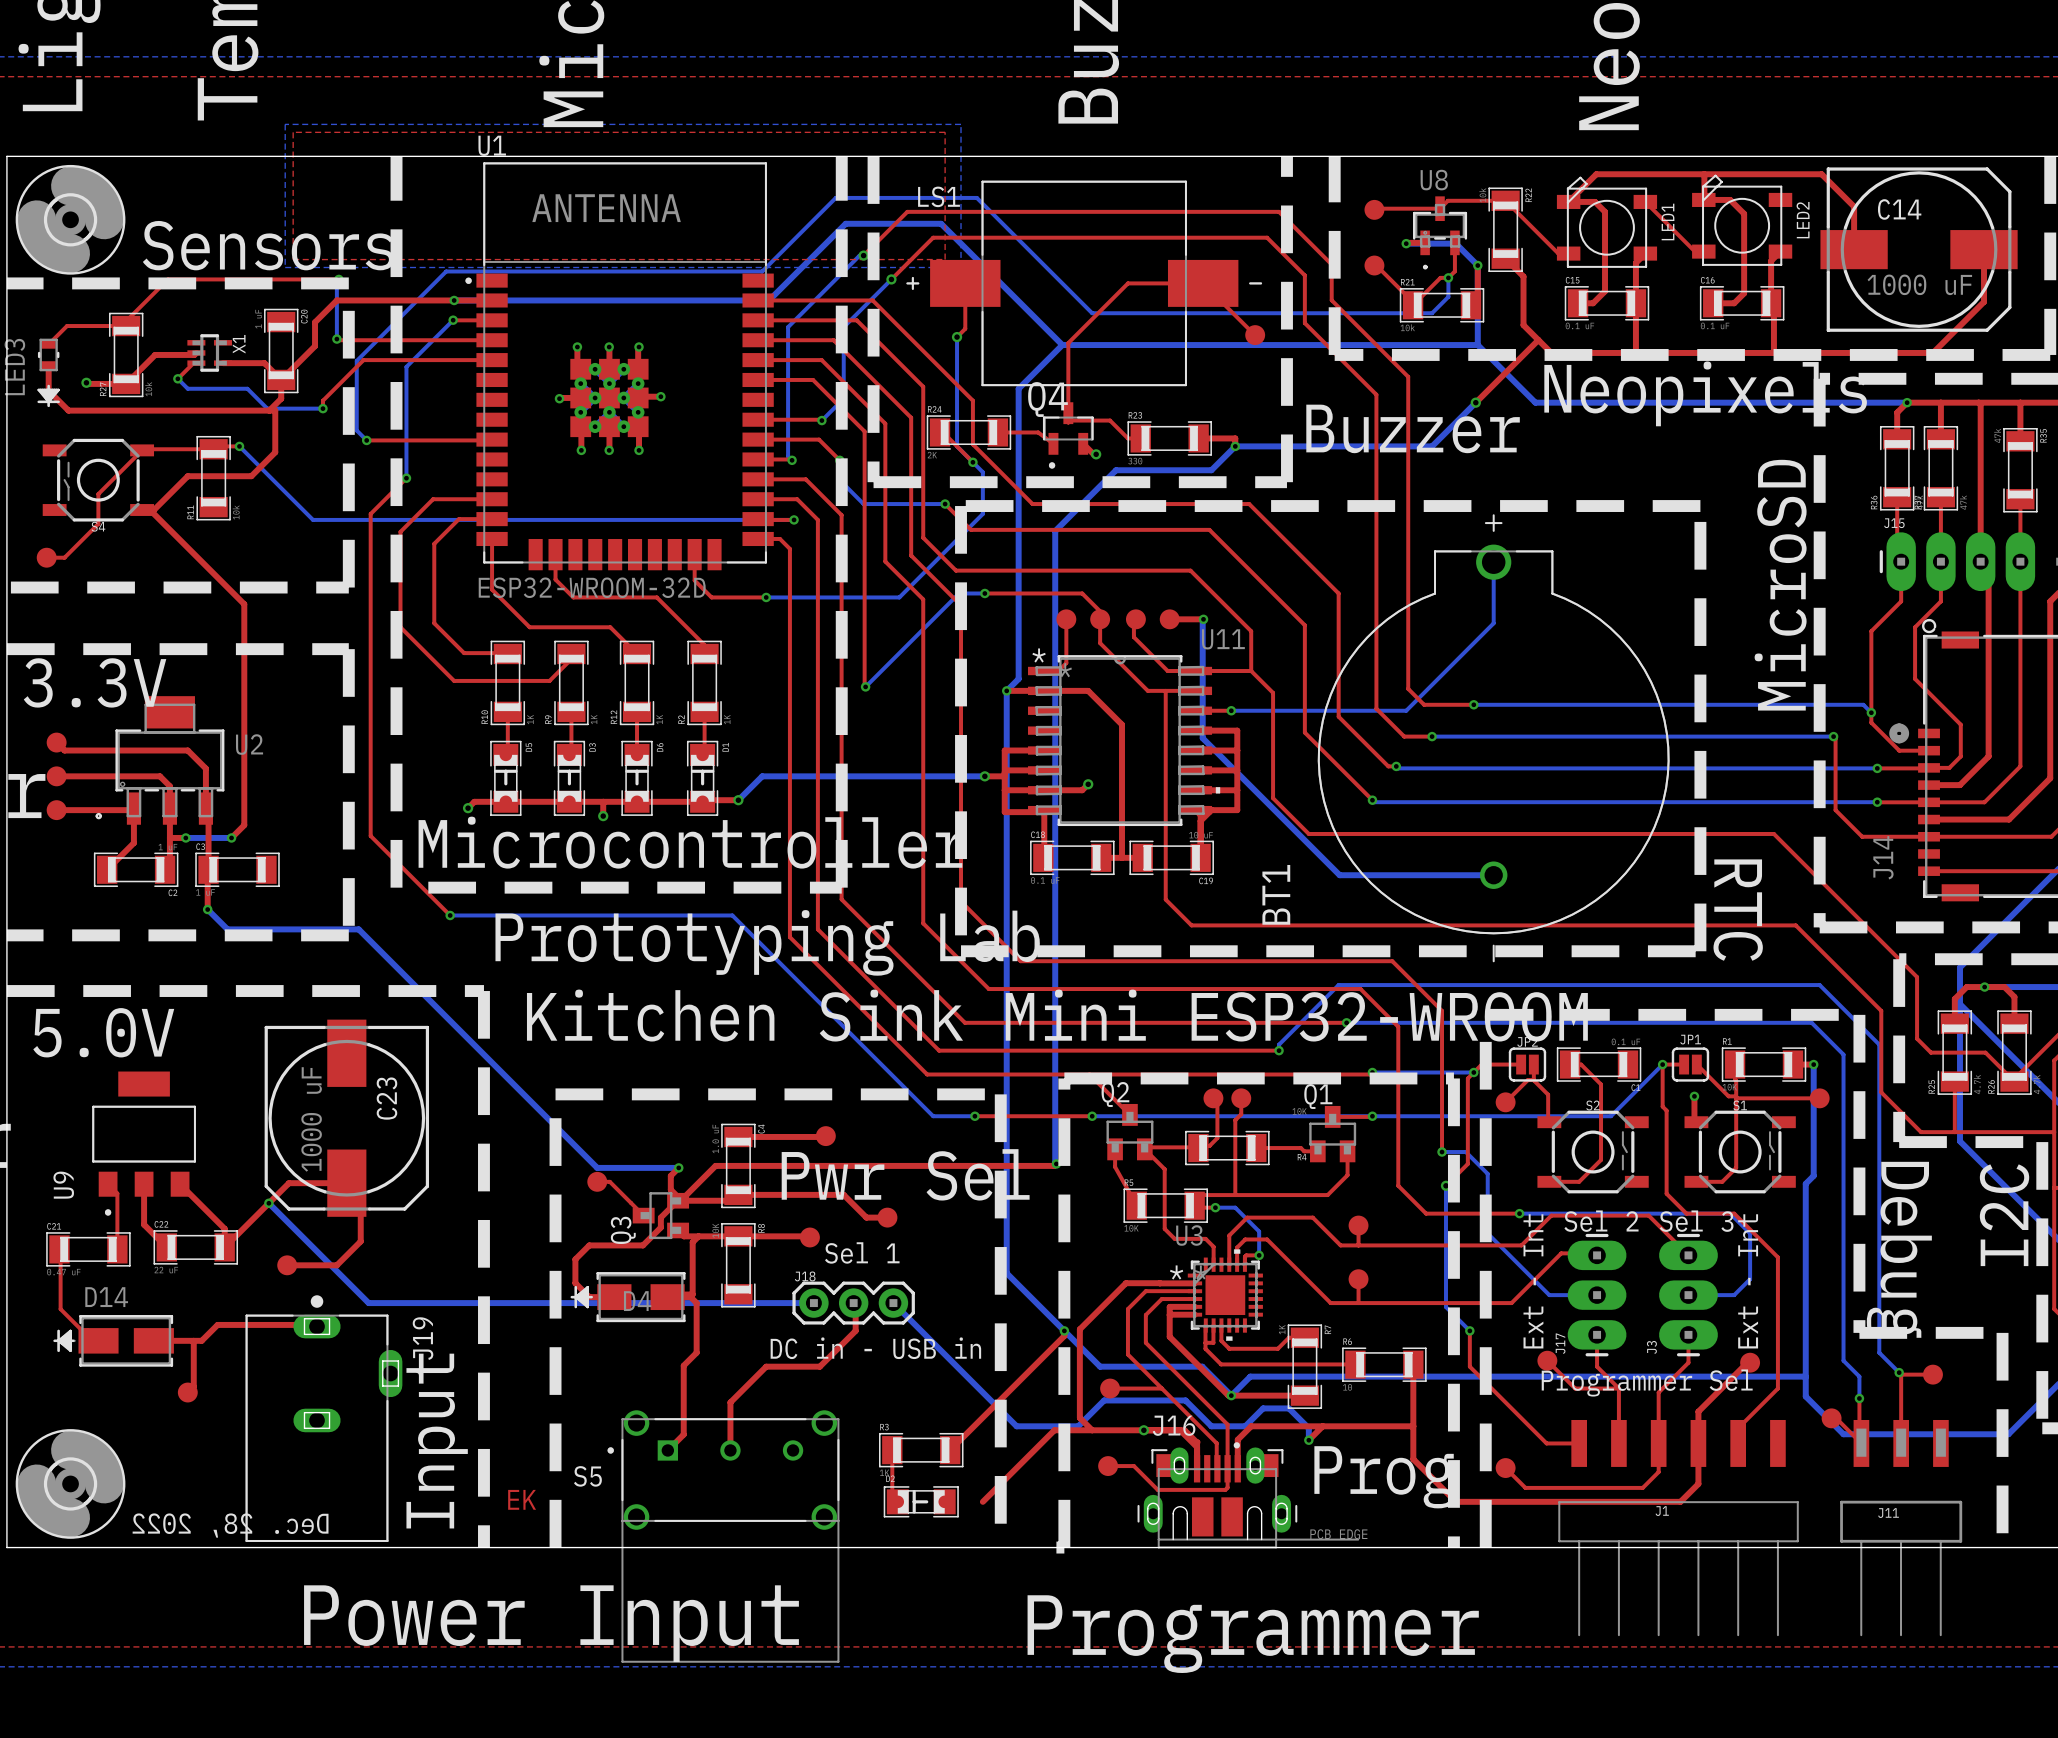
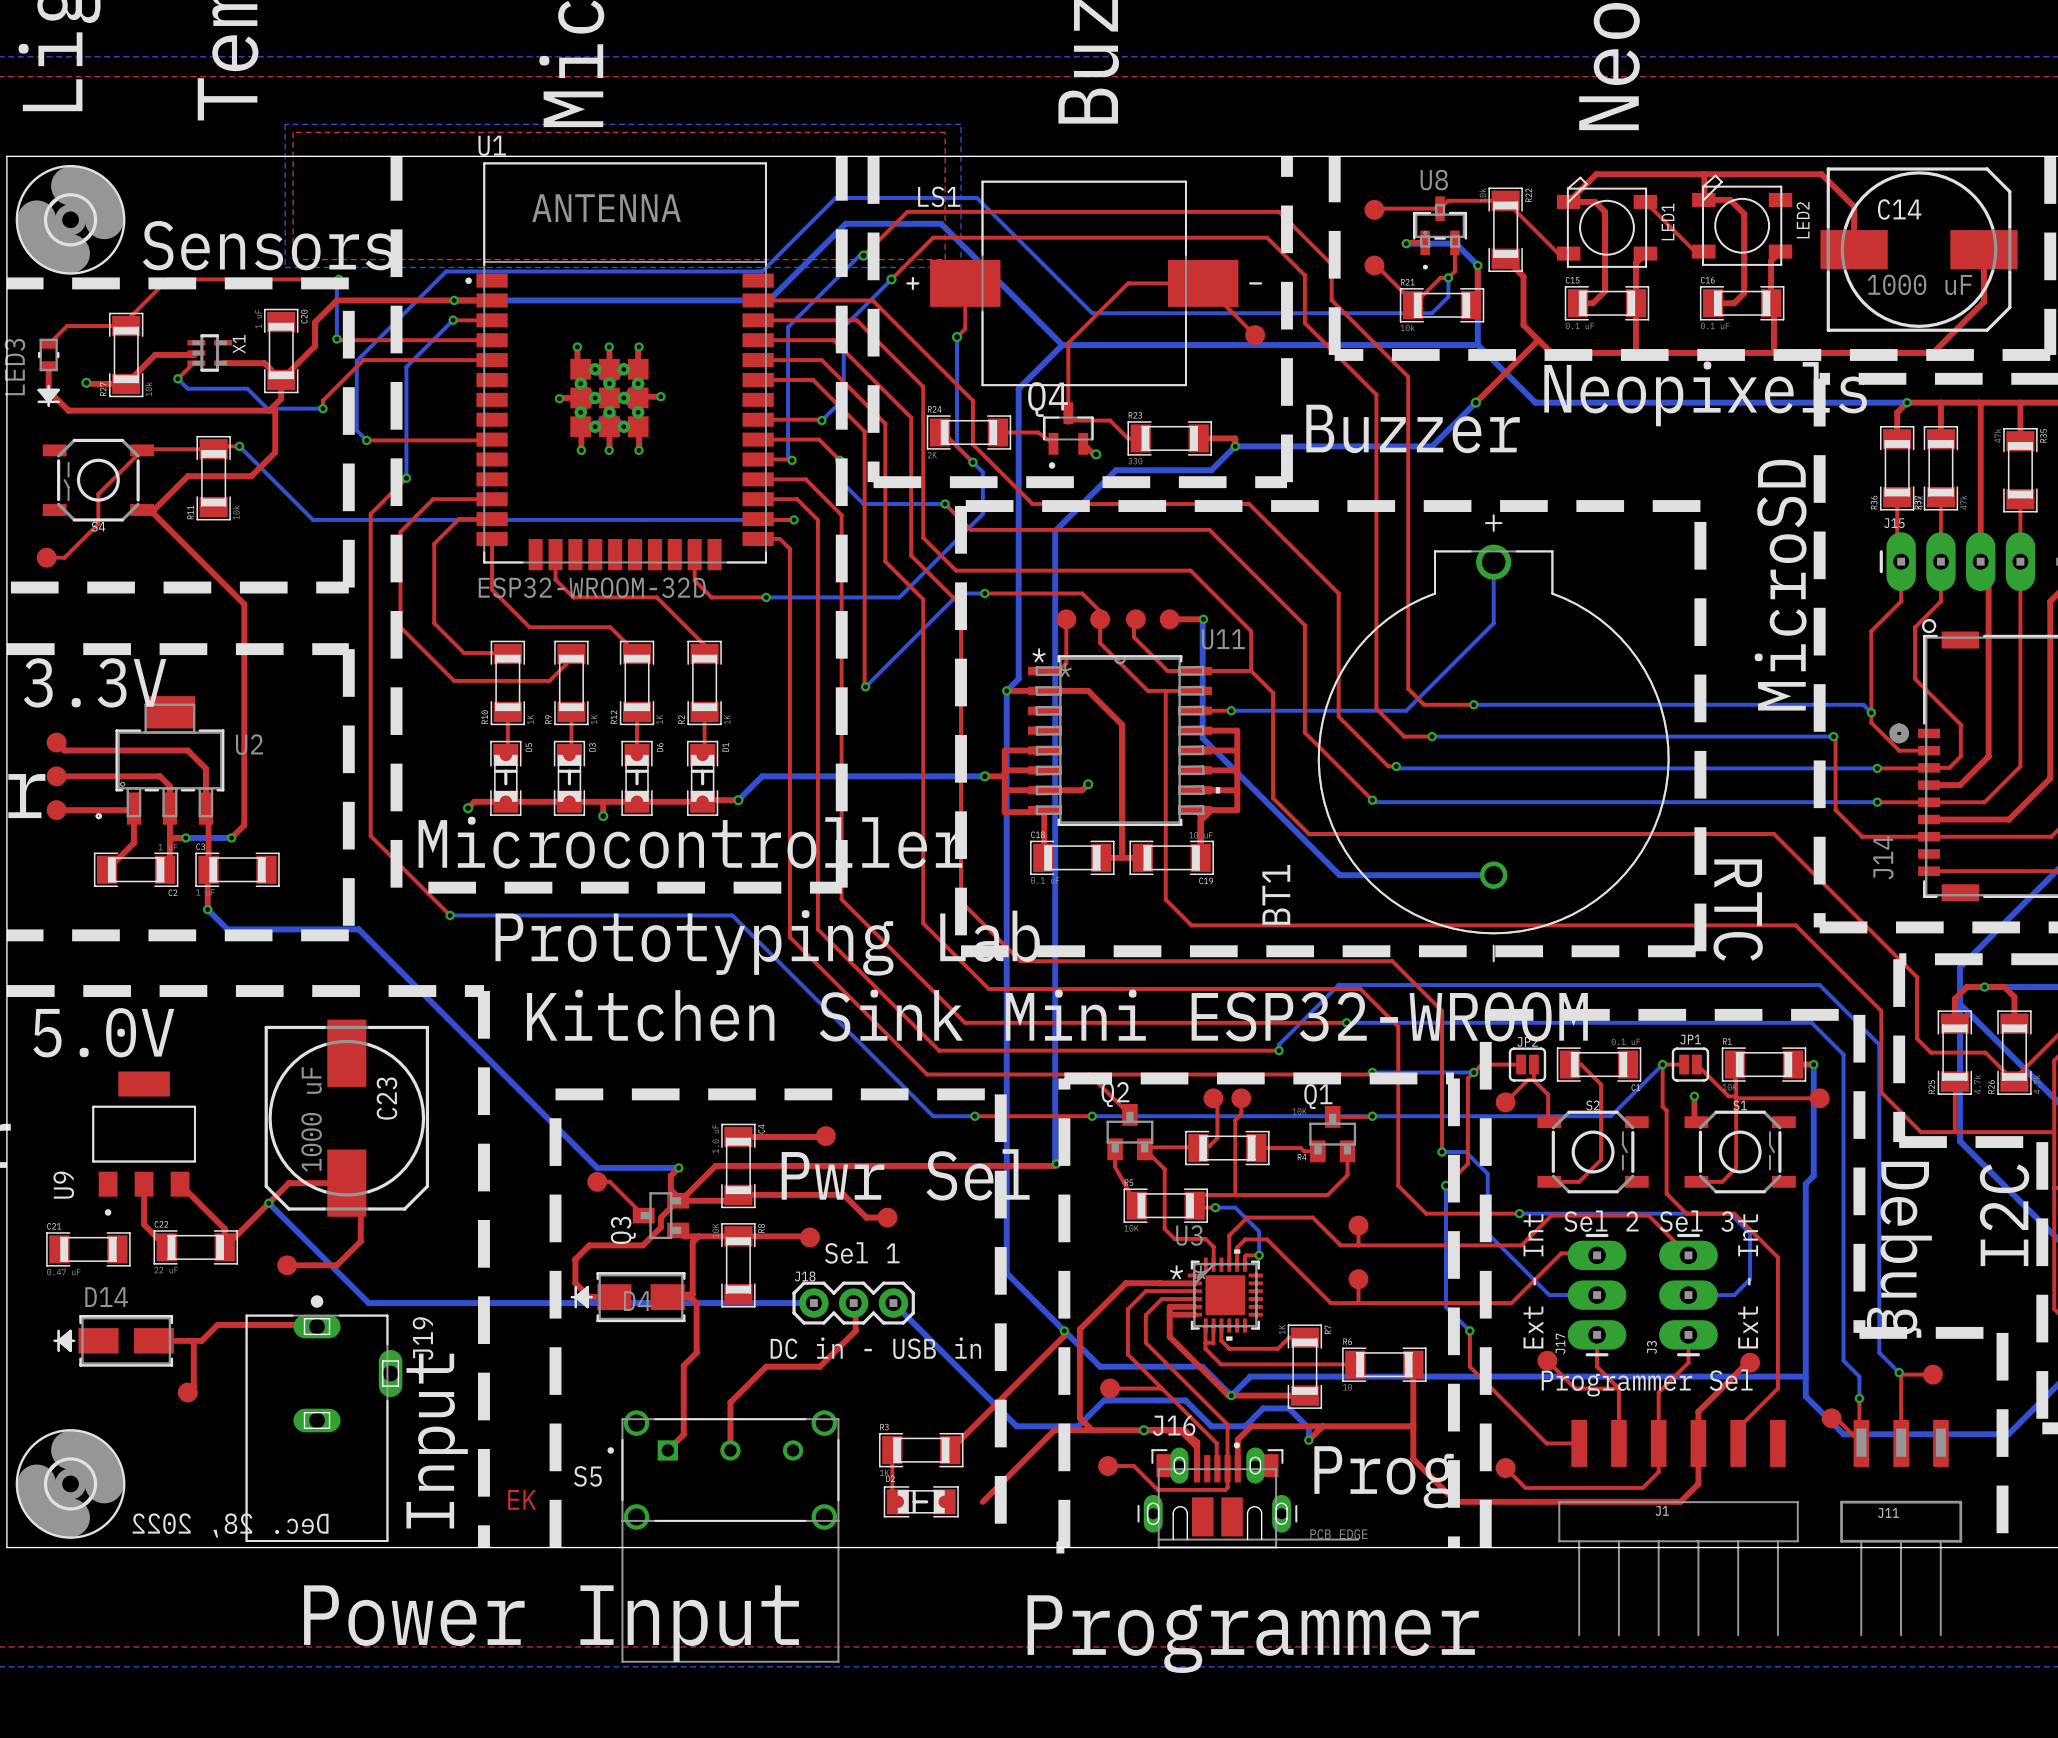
top track: (108, 1184) (117, 1193) (117, 1249) -> none
top track: (59, 1249) (60, 1309) (81, 1330) (88, 1330) (98, 1340) -> none

